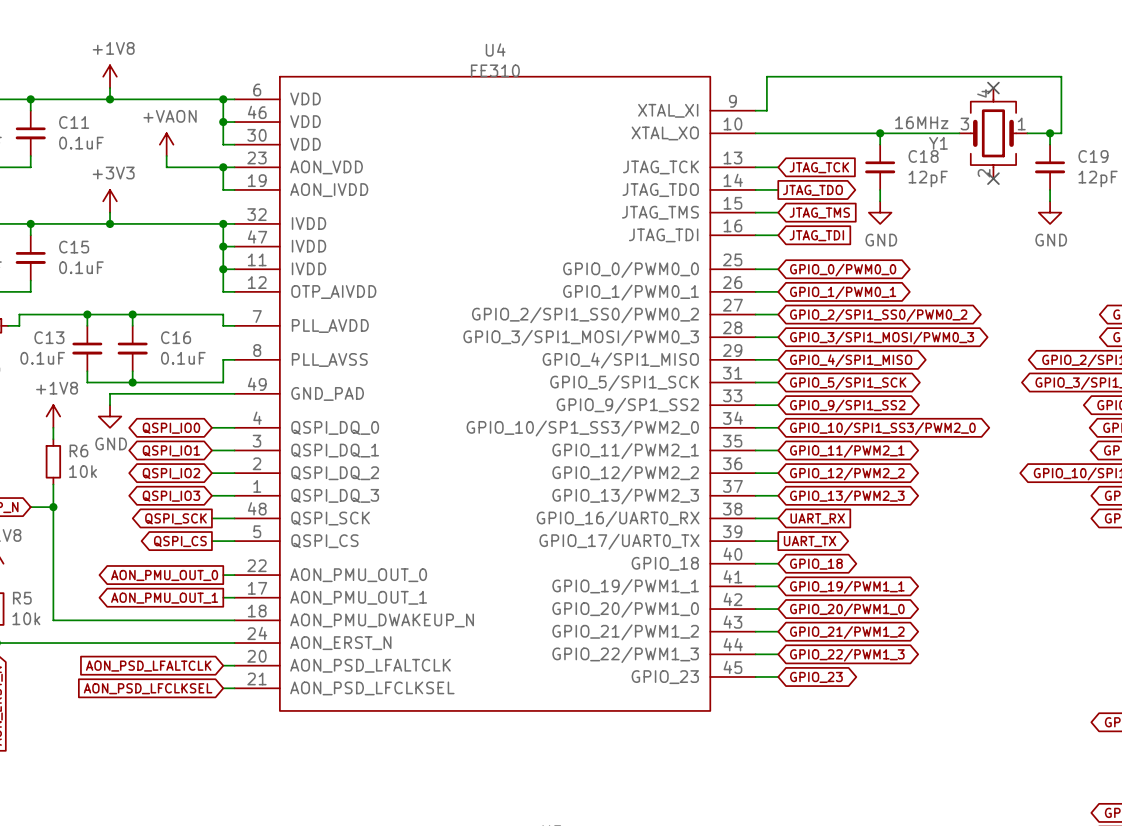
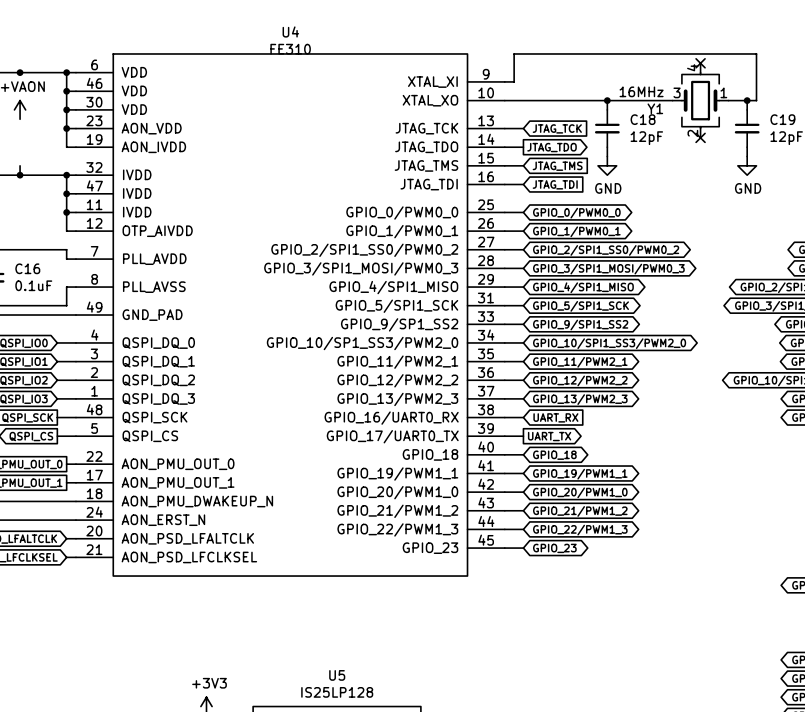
junction: none -> (20, 72)
junction: none -> (66, 109)
wire: (166, 155) (166, 167) (223, 167) -> (66, 109) (66, 128)
wire: none -> (20, 165) (20, 175)
junction: none -> (20, 175)

